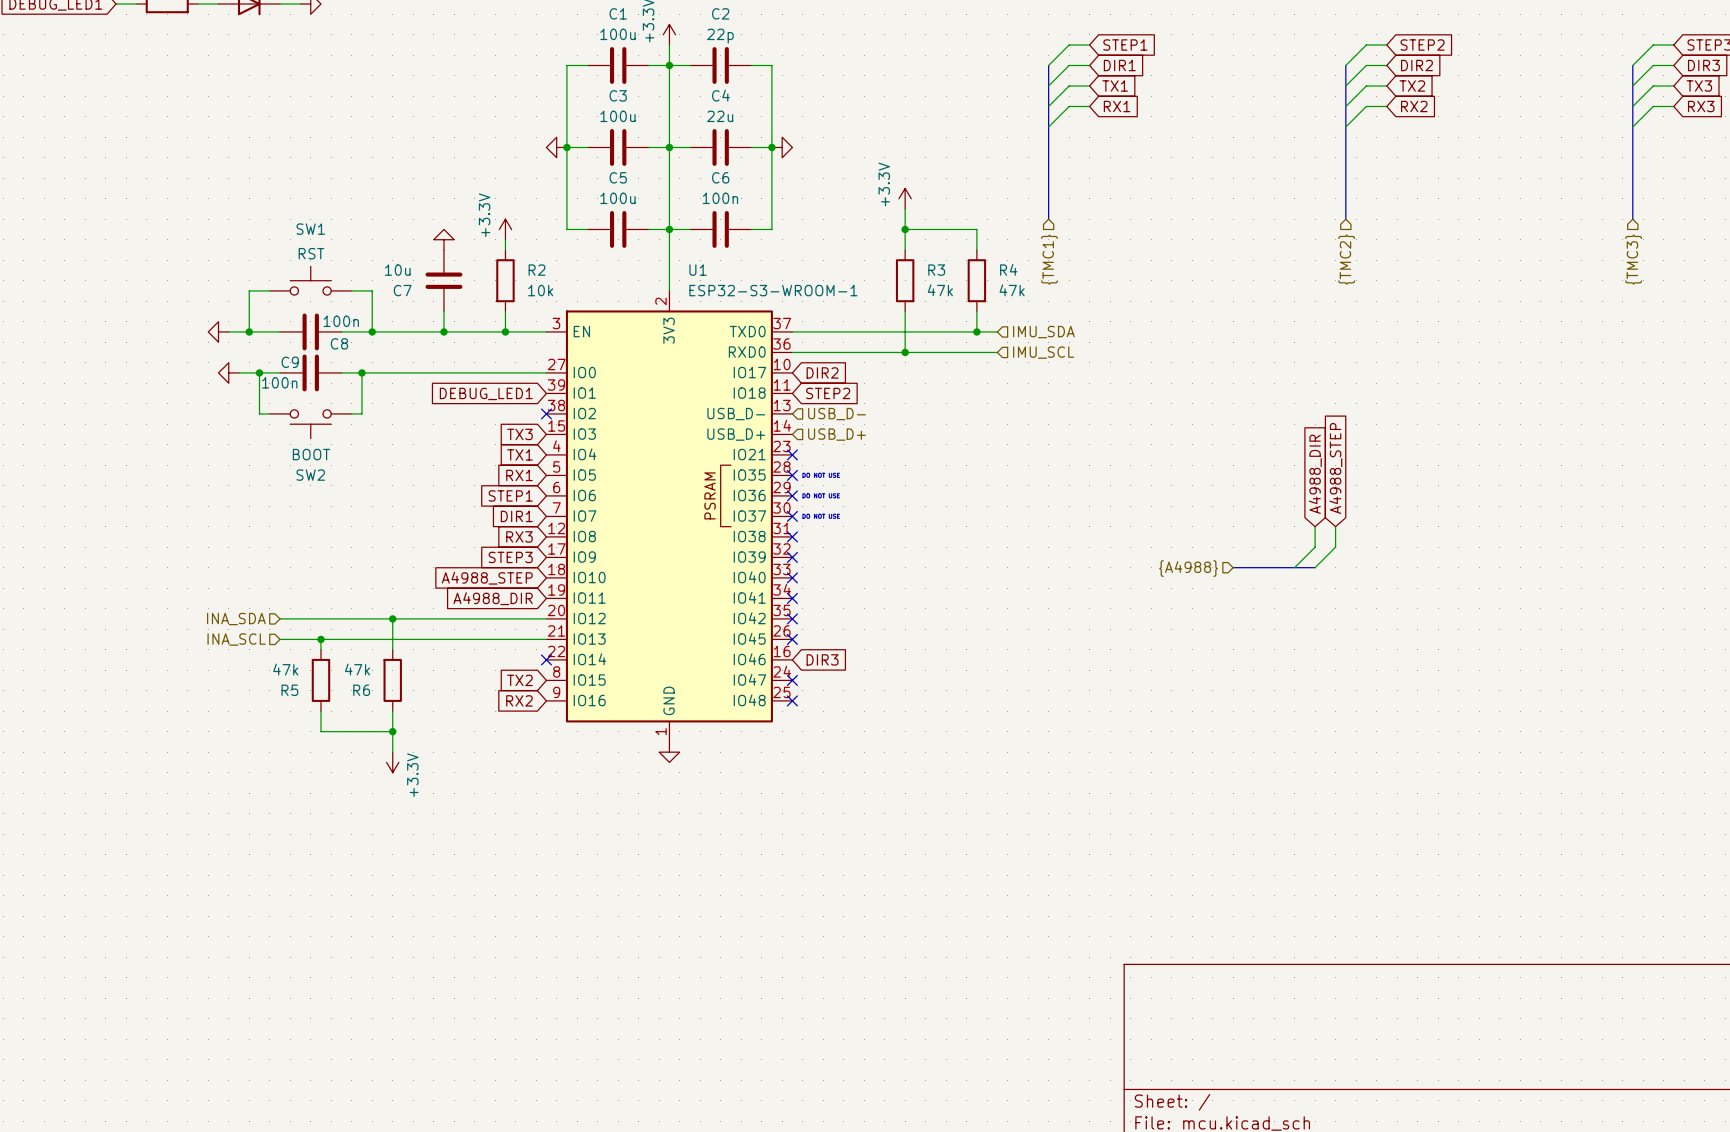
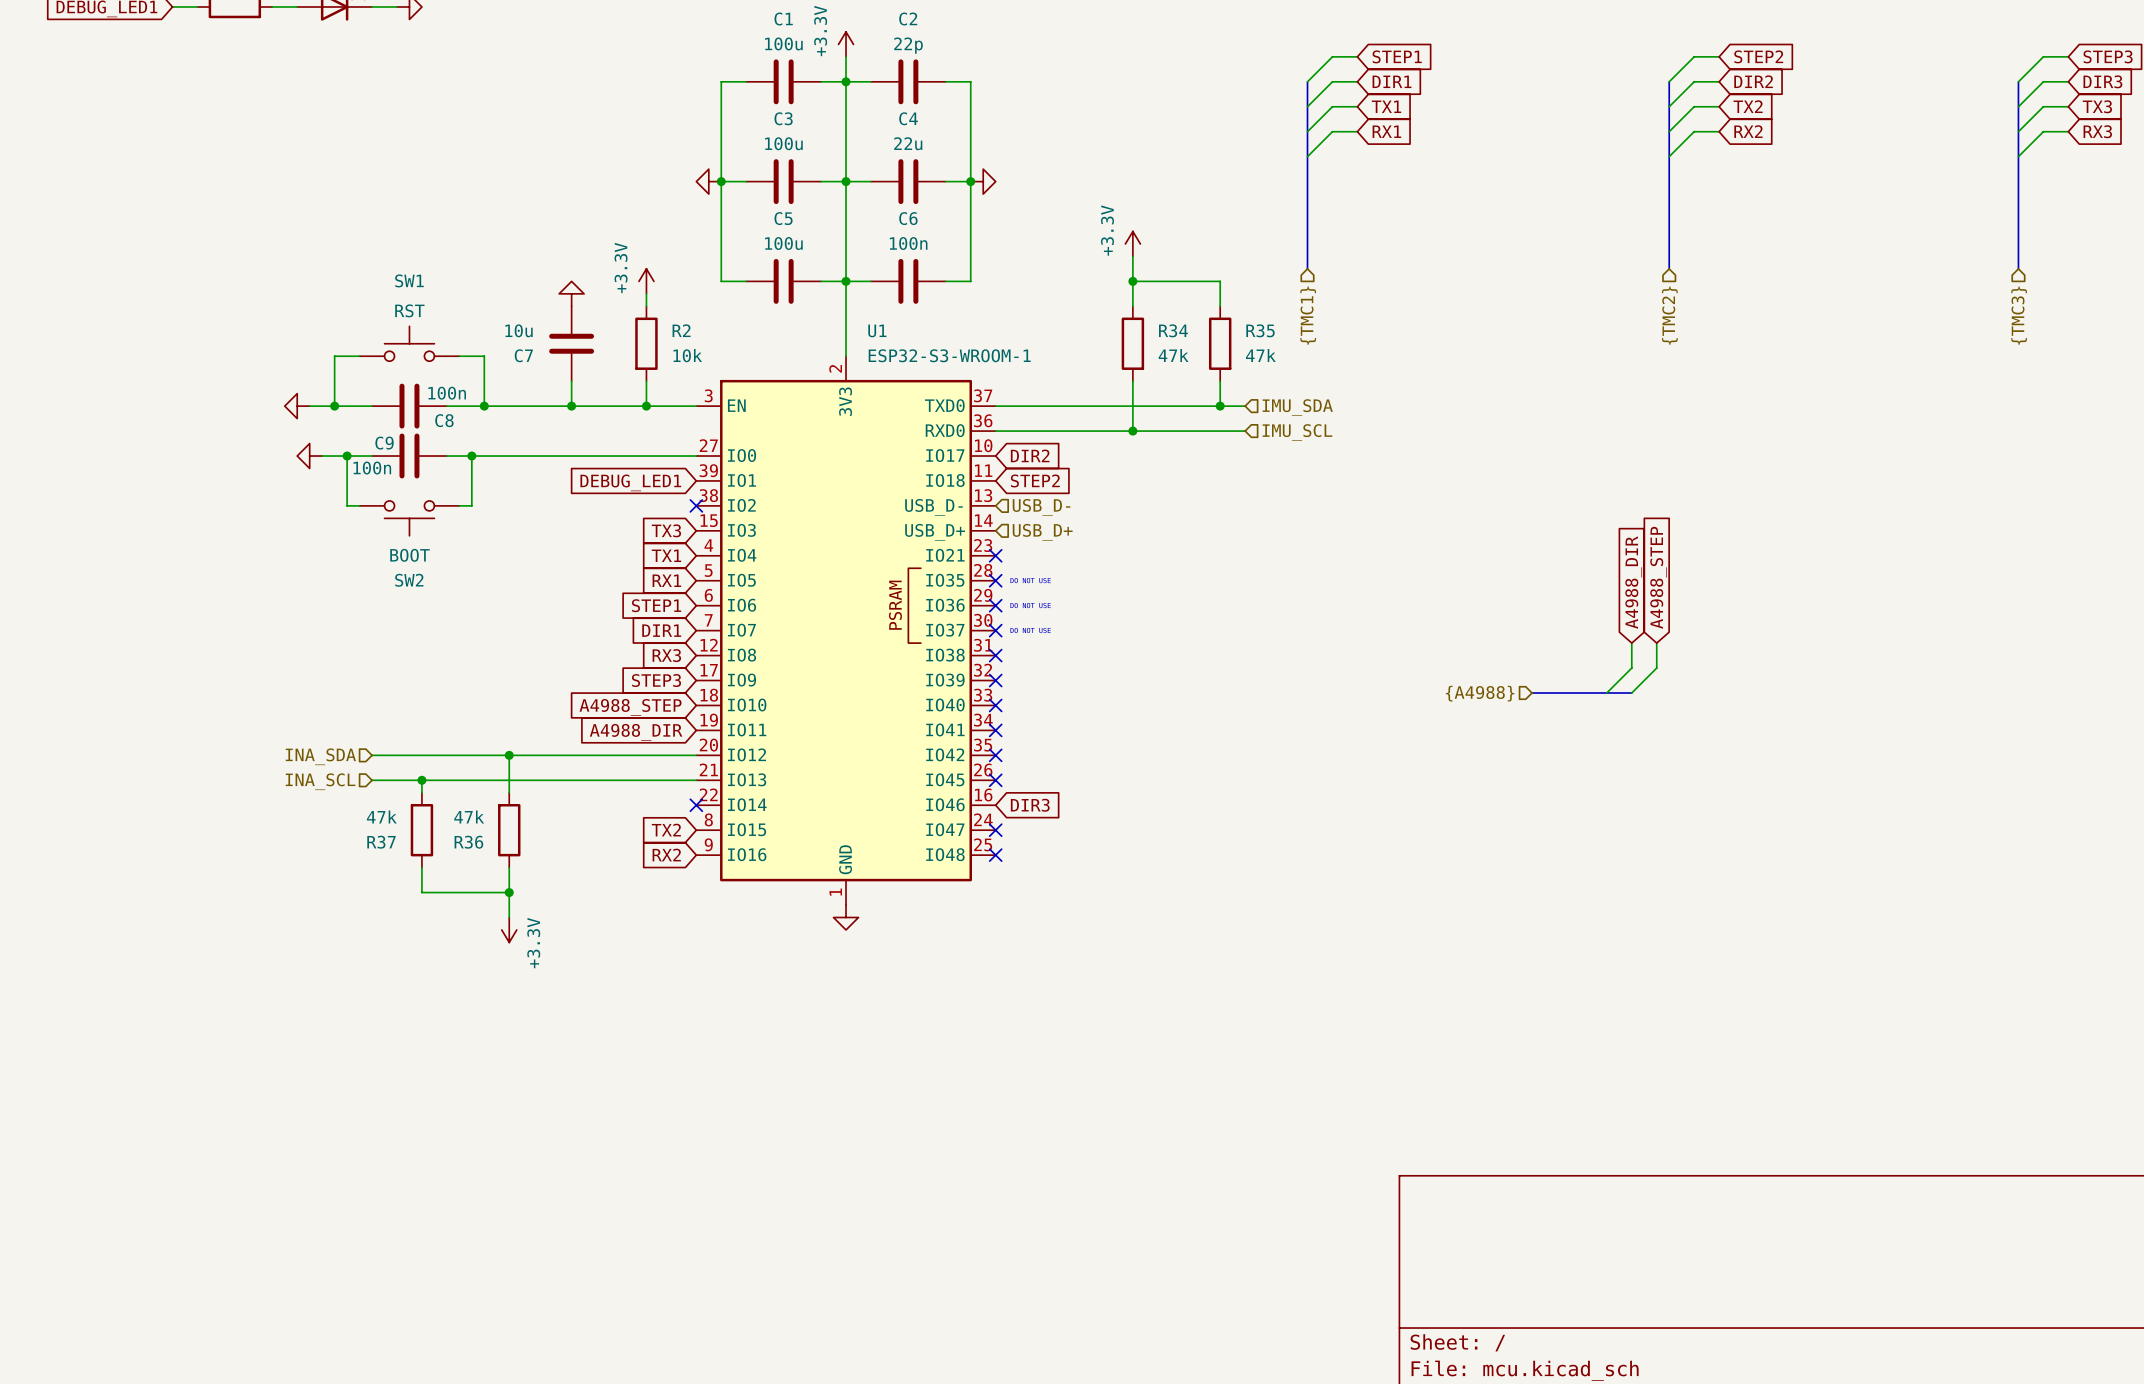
R4 name: R4 (1008, 269) -> R35 (1260, 330)
R3 name: R3 (936, 270) -> R34 (1173, 330)
R5 name: R5 (289, 690) -> R37 (381, 842)
R6 name: R6 (361, 690) -> R36 (468, 842)

